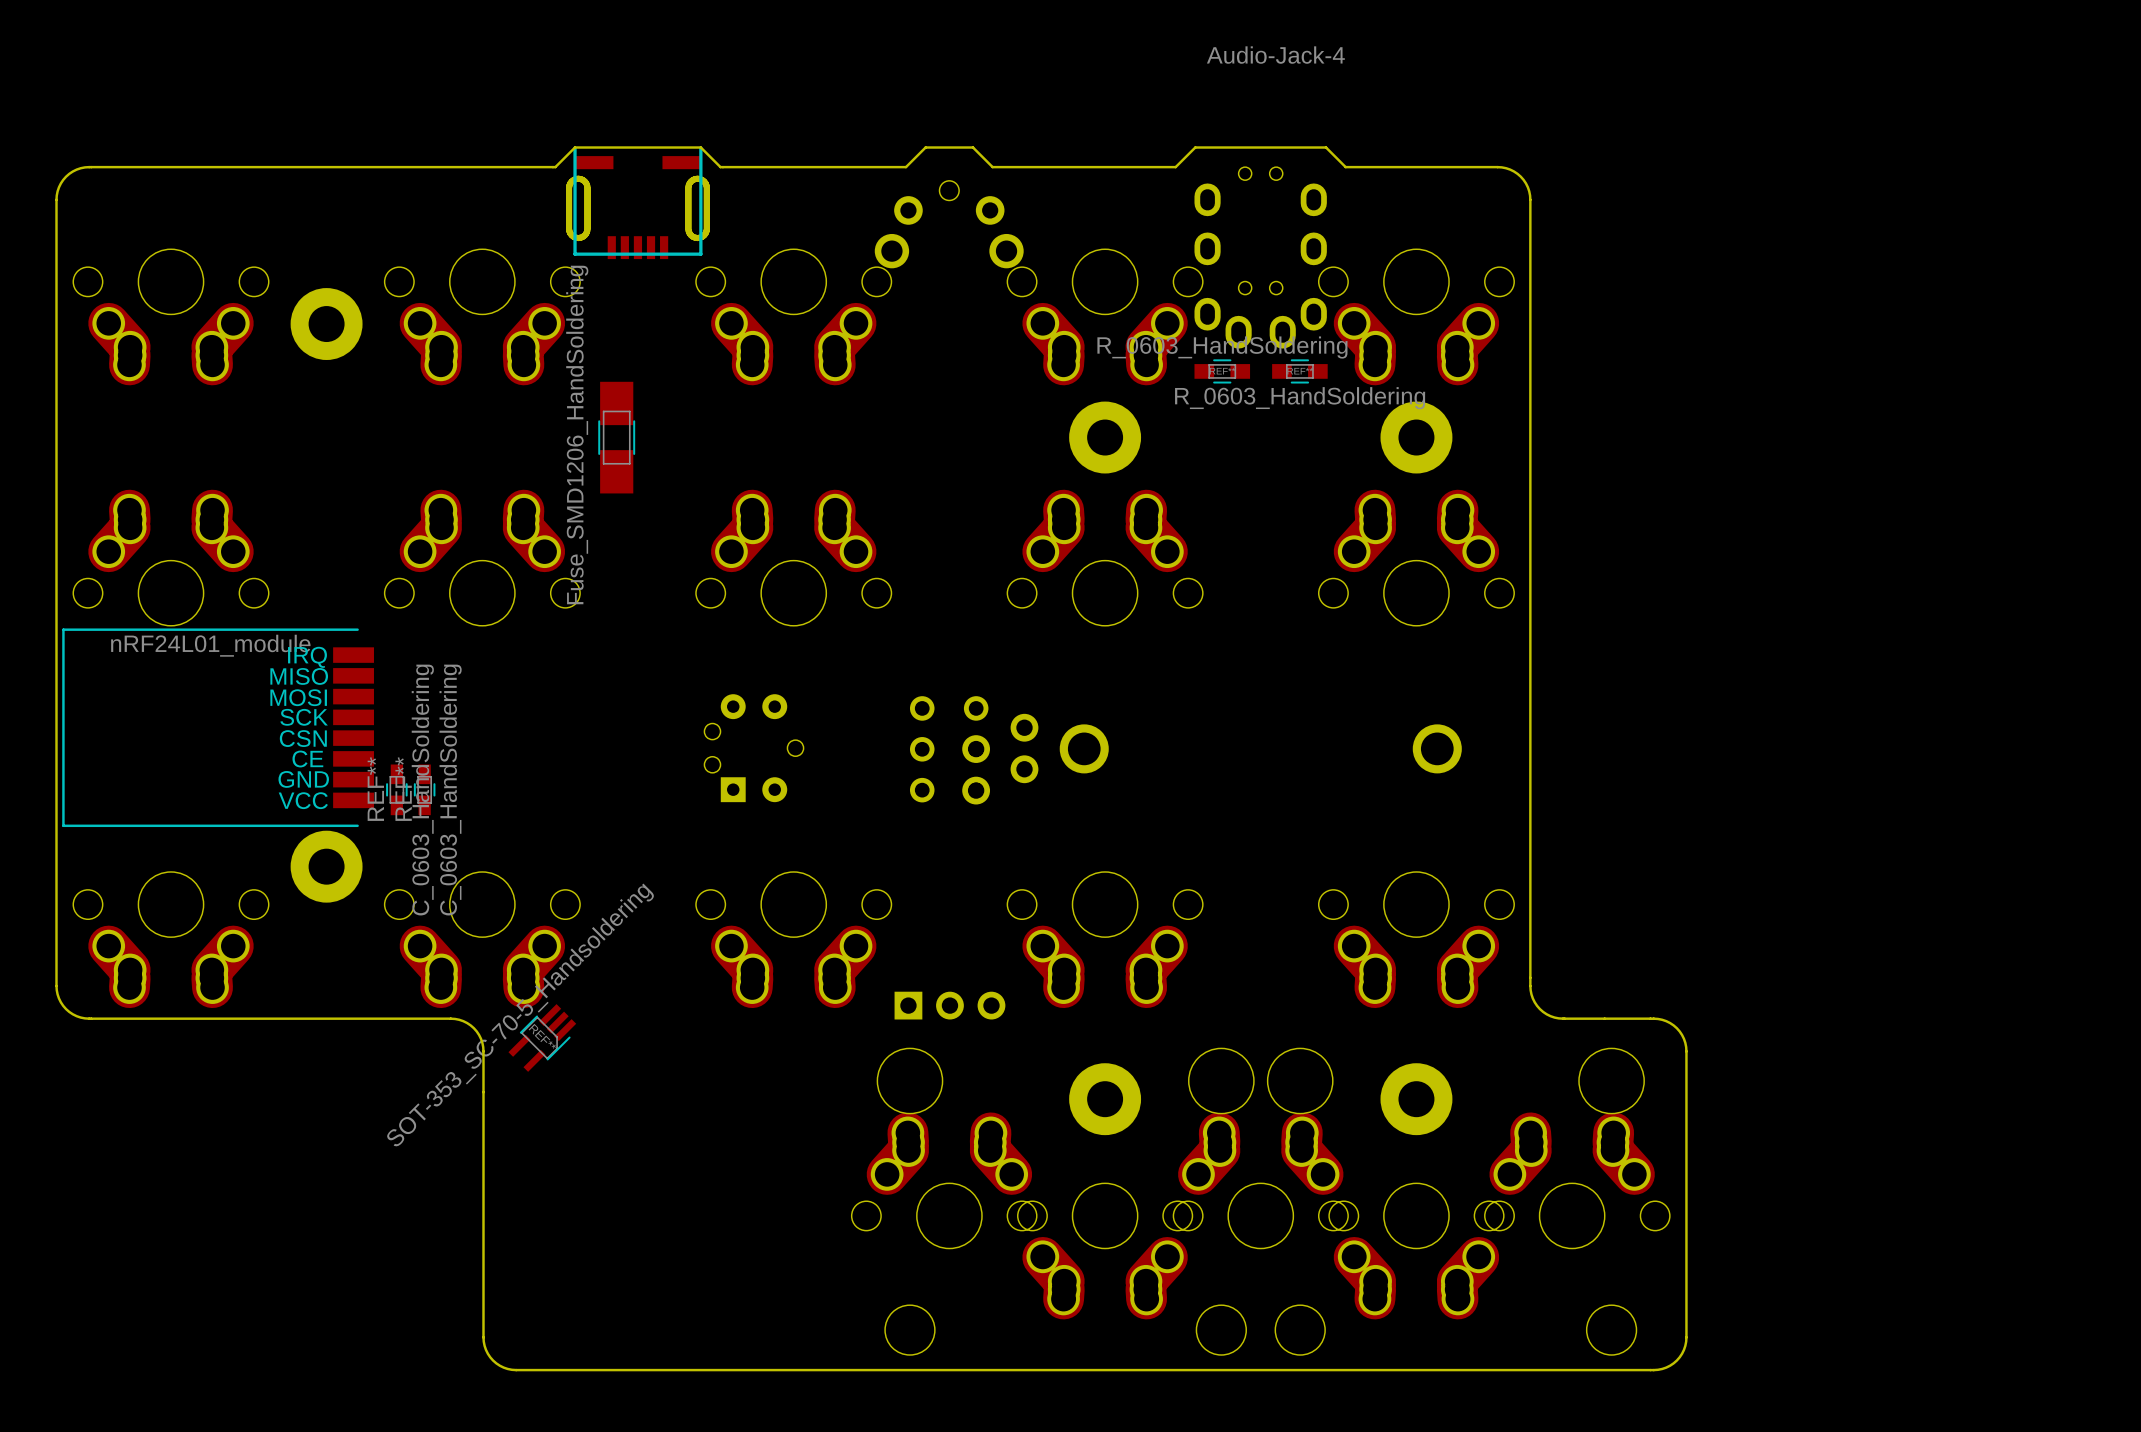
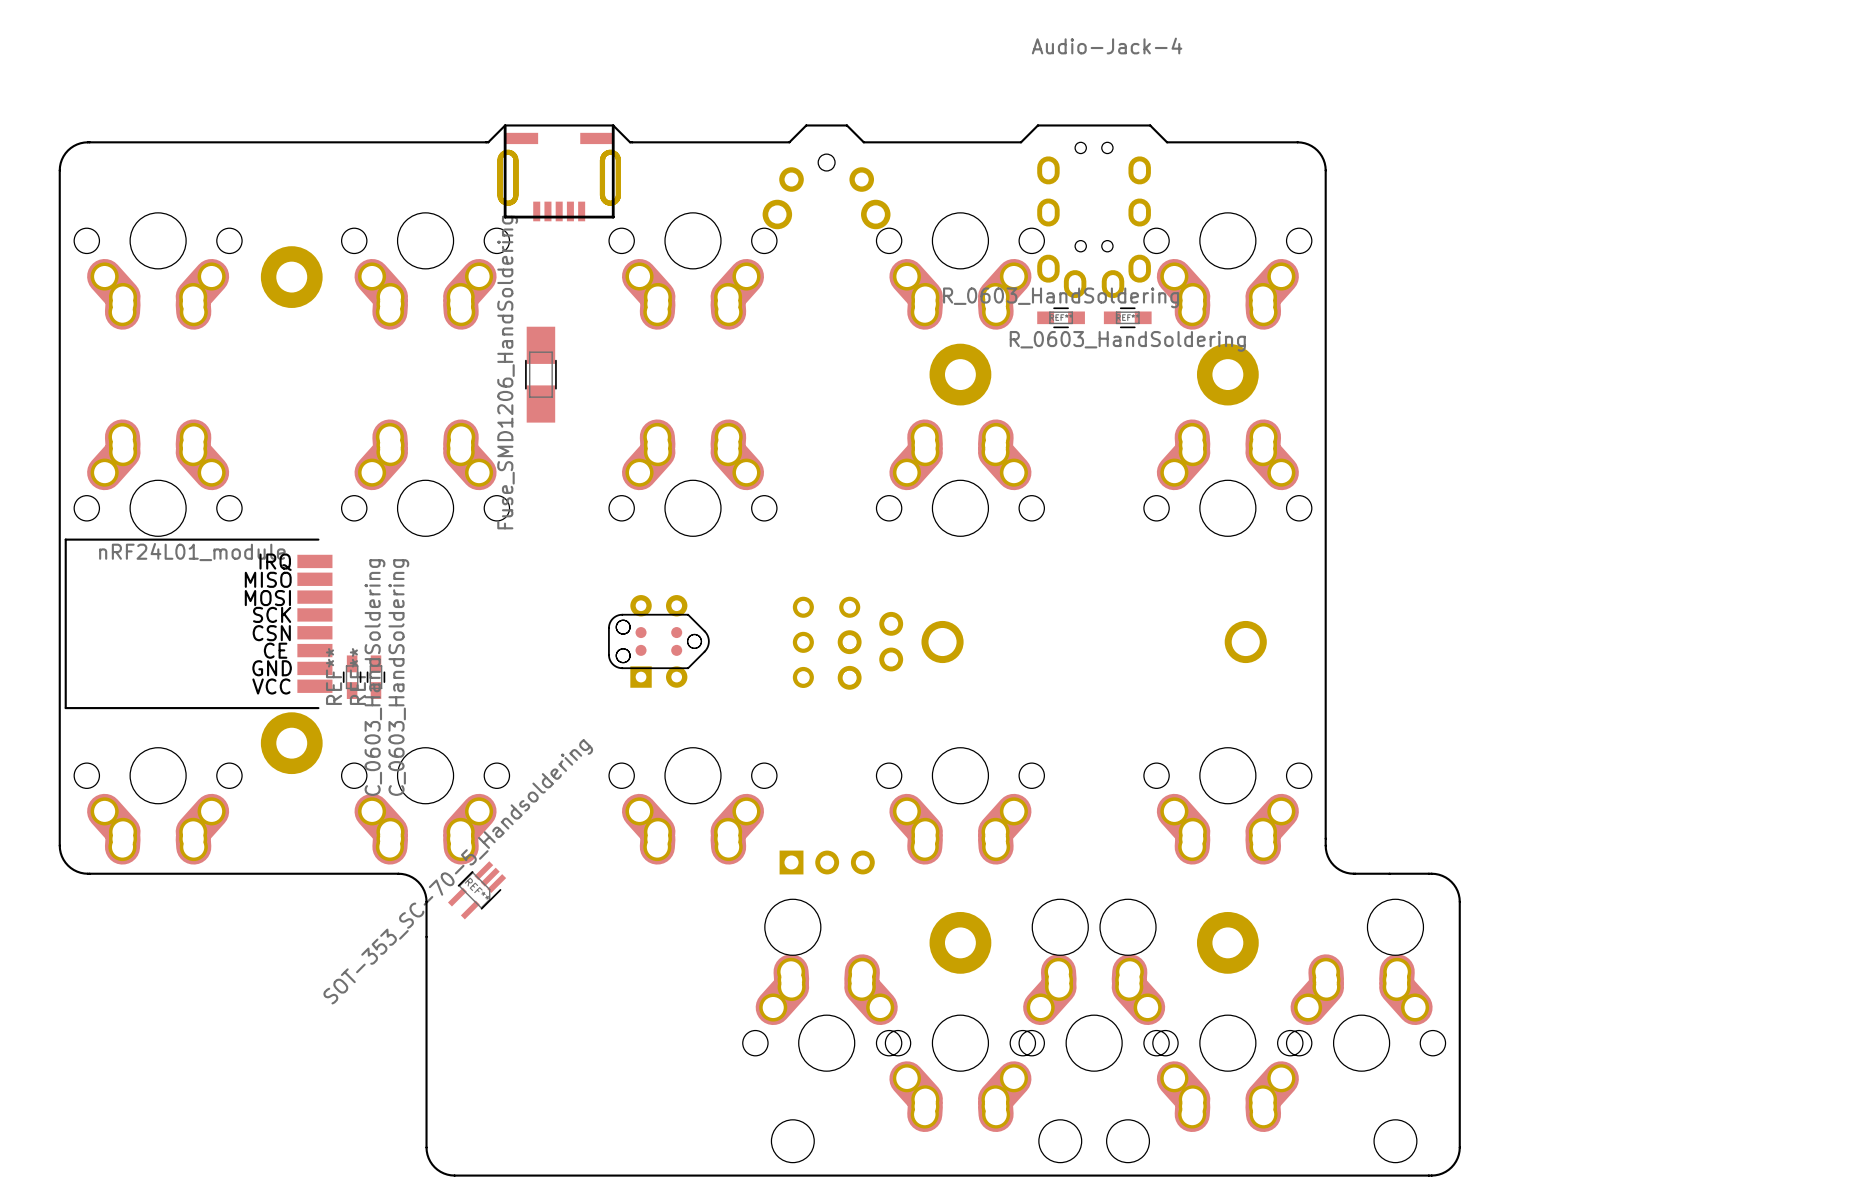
part: none -> (658, 641)

